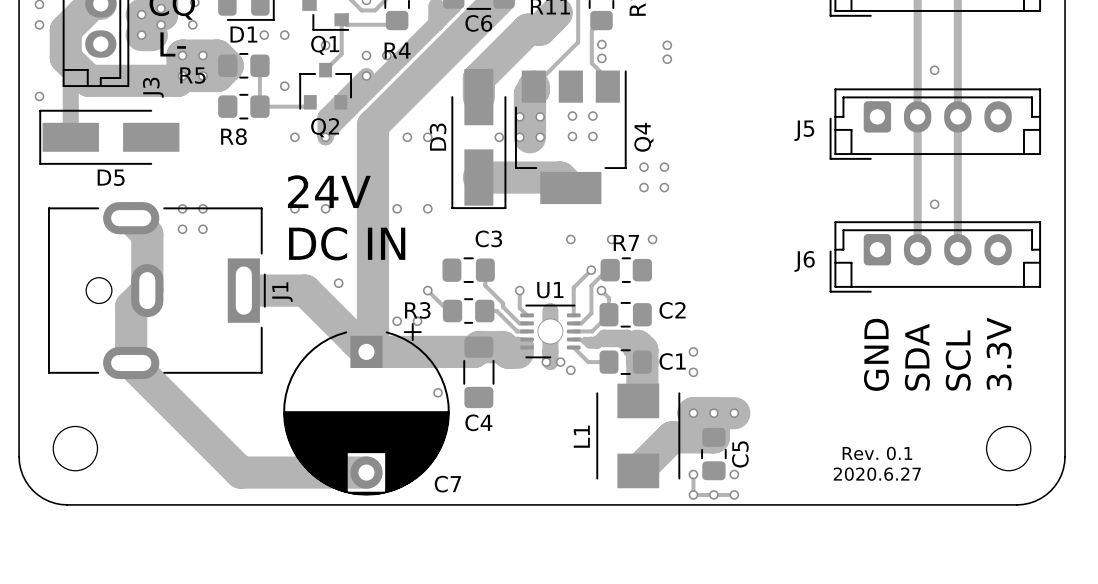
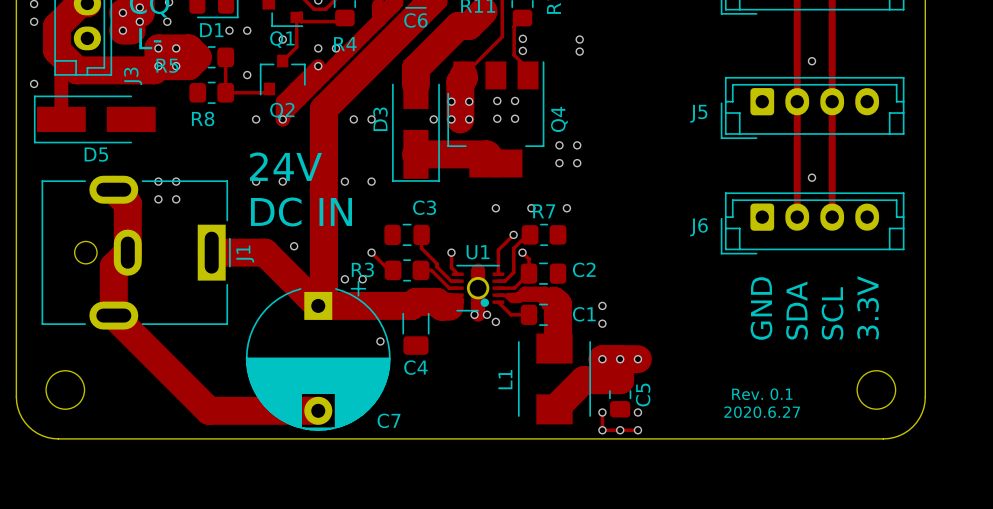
U1 footprint: [520, 304, 581, 359] -> [451, 264, 505, 312]

